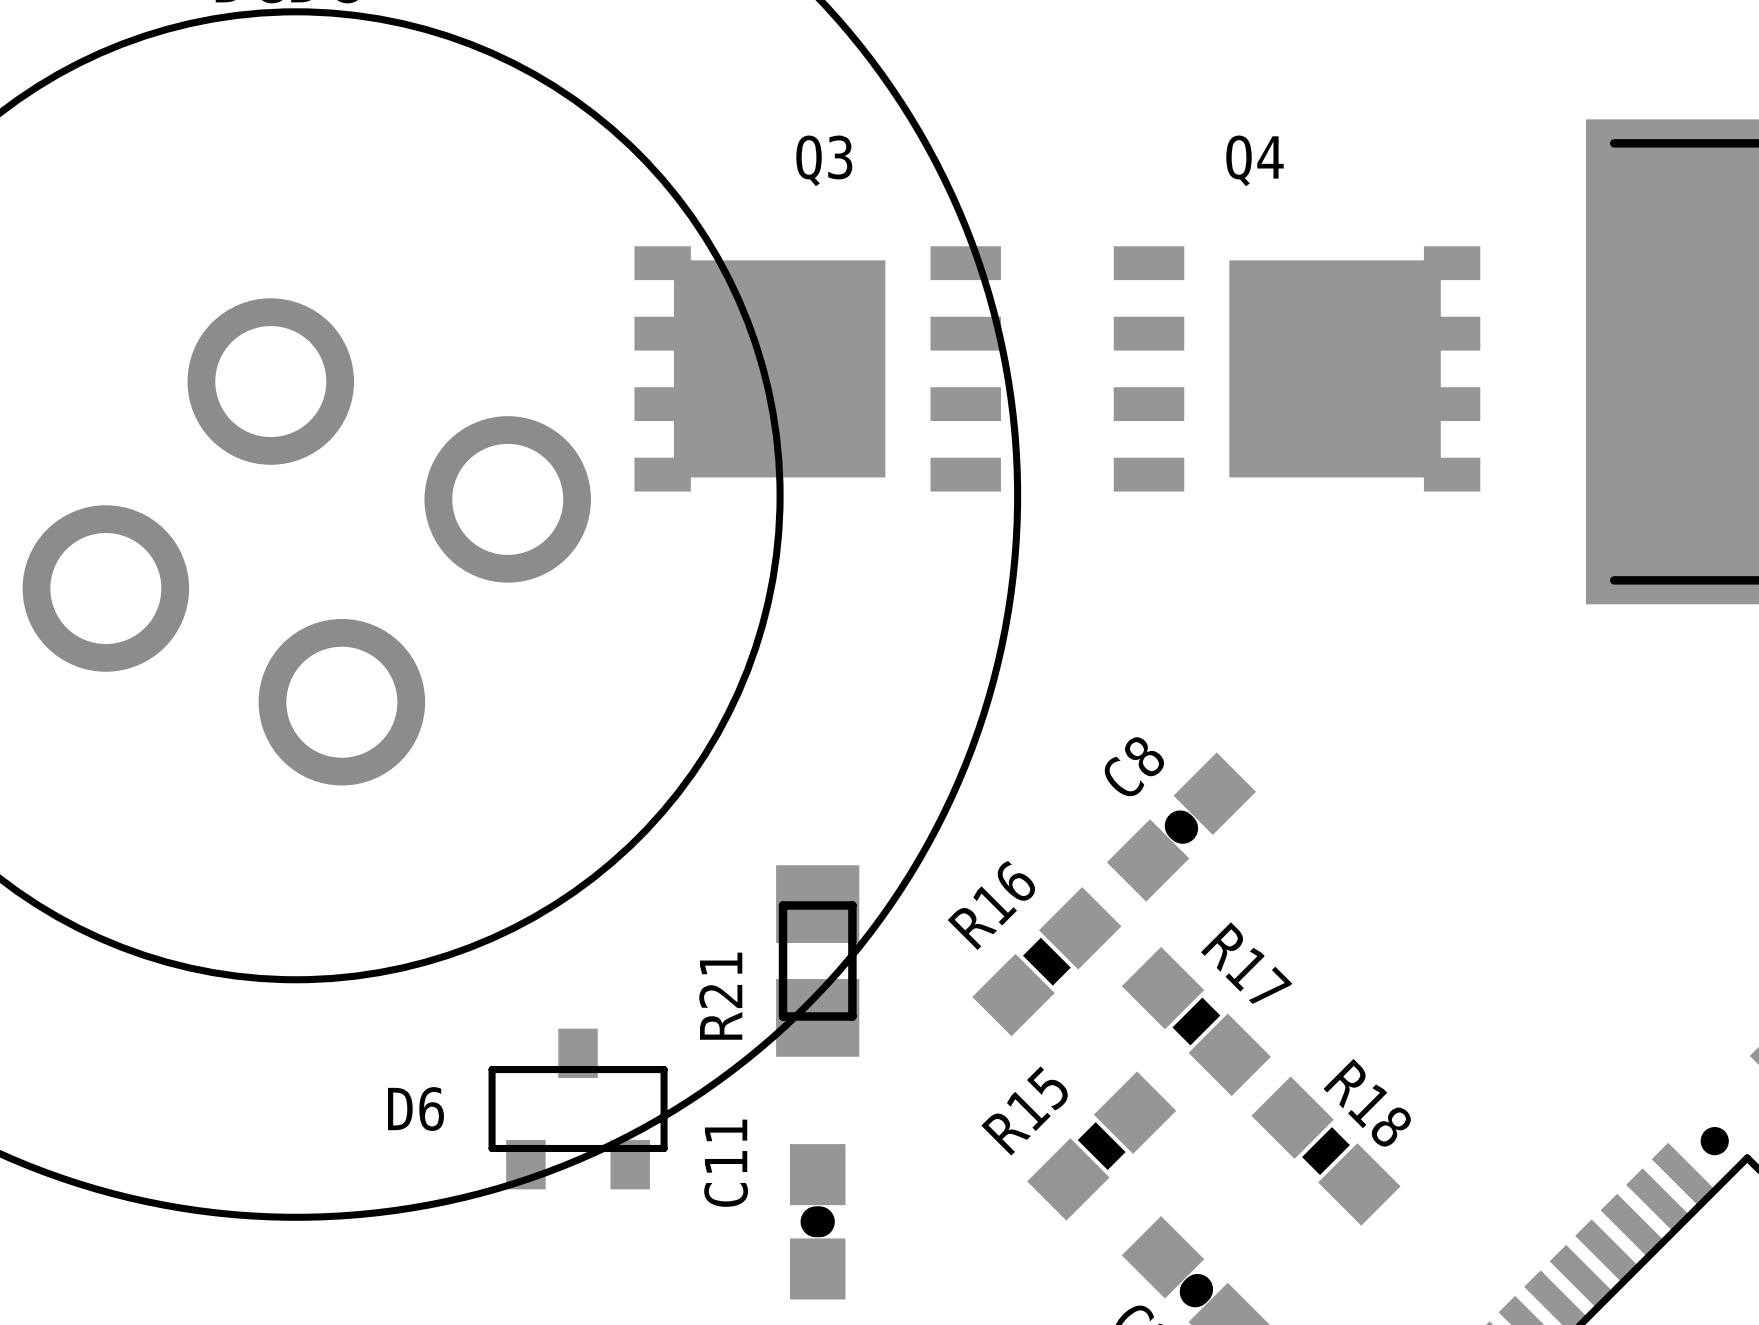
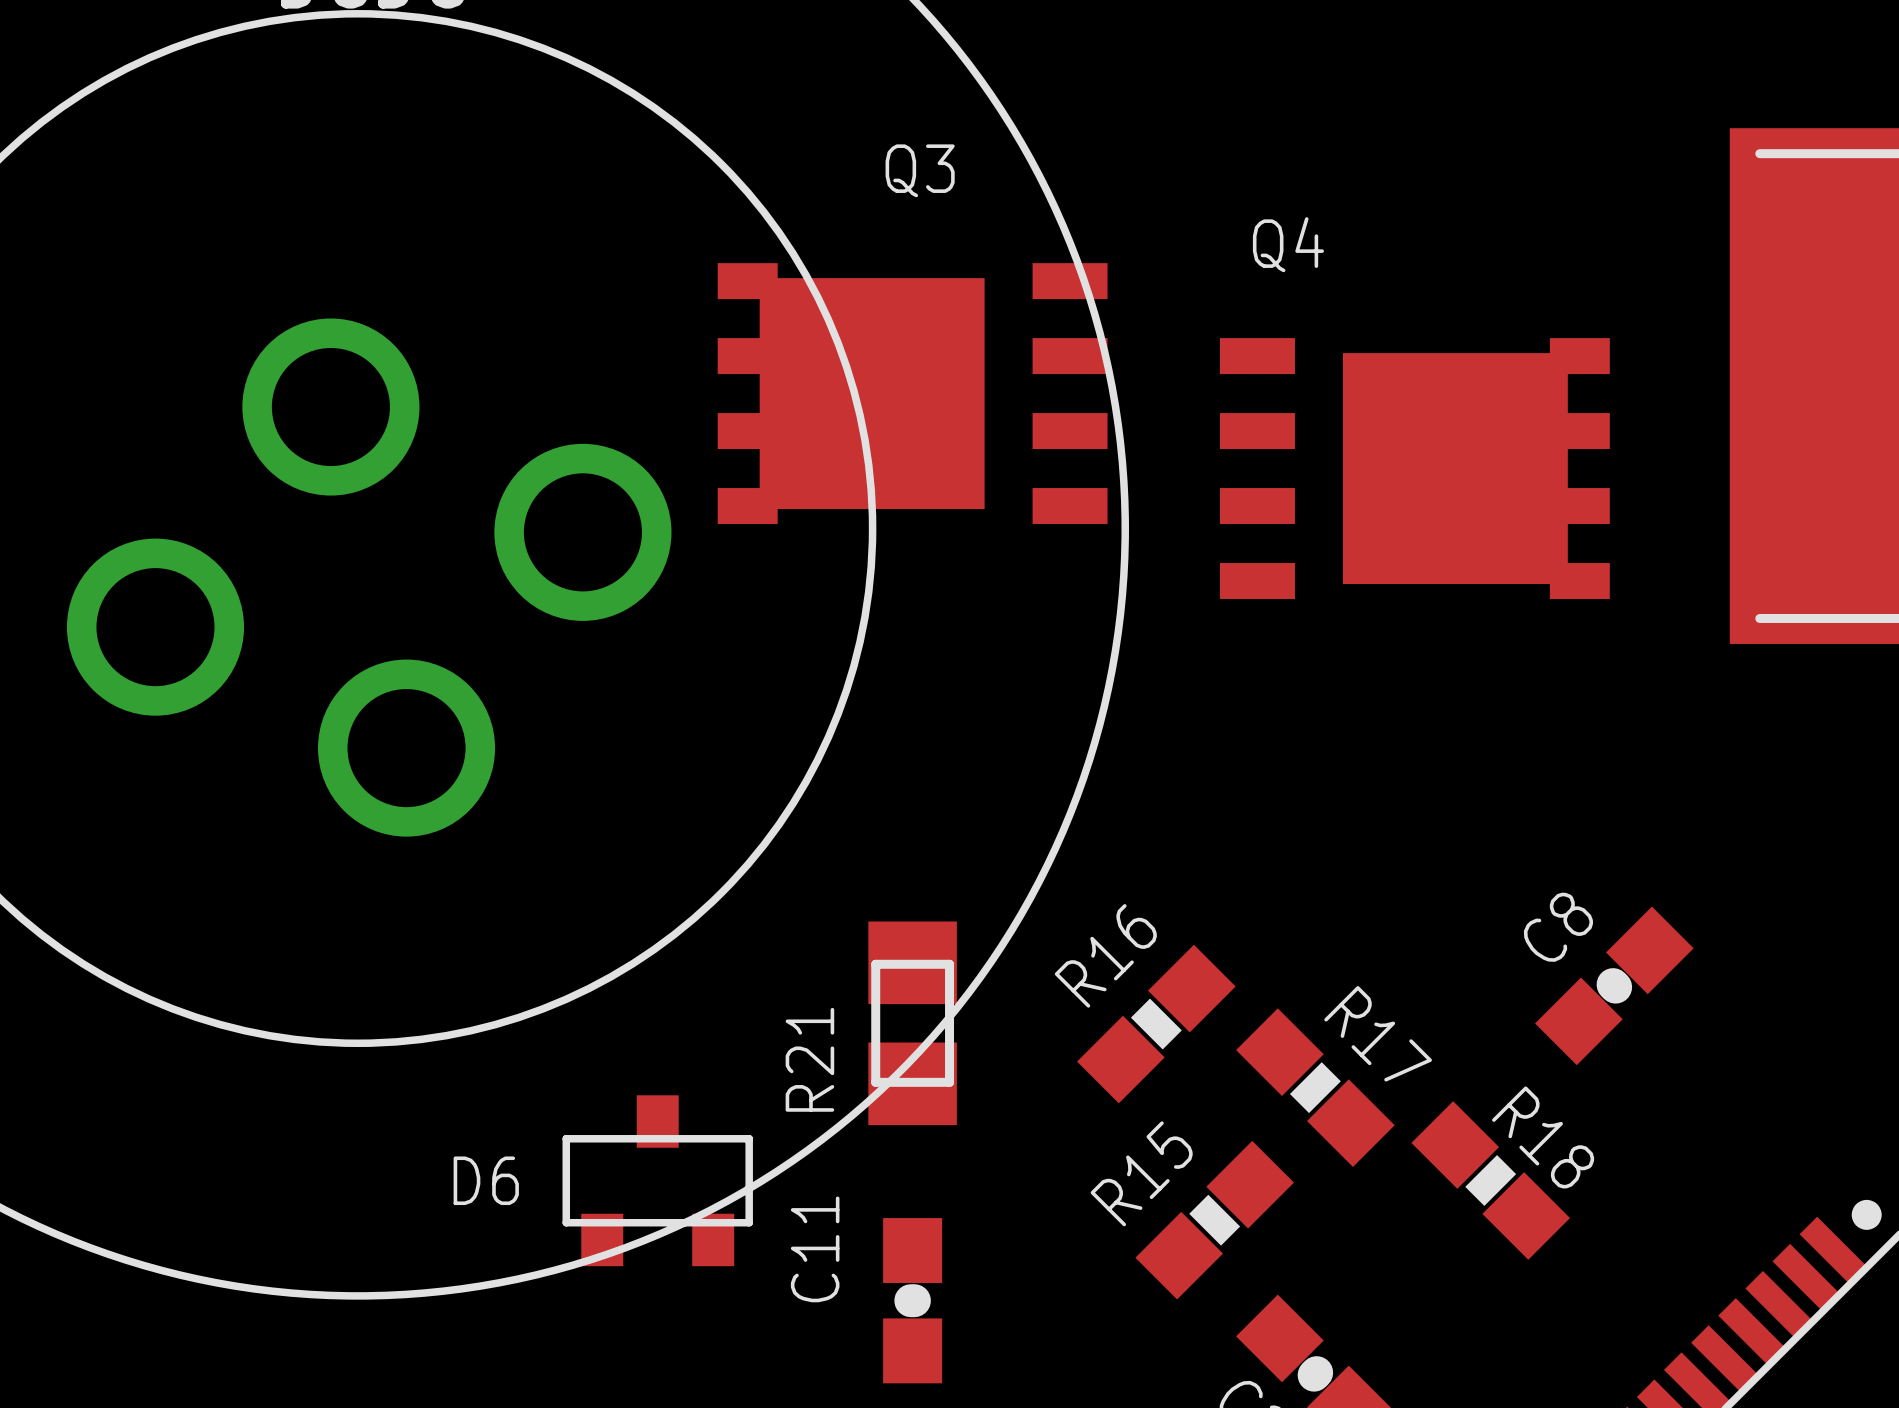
Q4 name position: Q4 (1254, 160) -> Q4 (1288, 244)
Q4 position: (1297, 368) -> (1414, 468)
C8 position: (1181, 827) -> (1614, 985)
R18 position: (1325, 1151) -> (1490, 1180)

